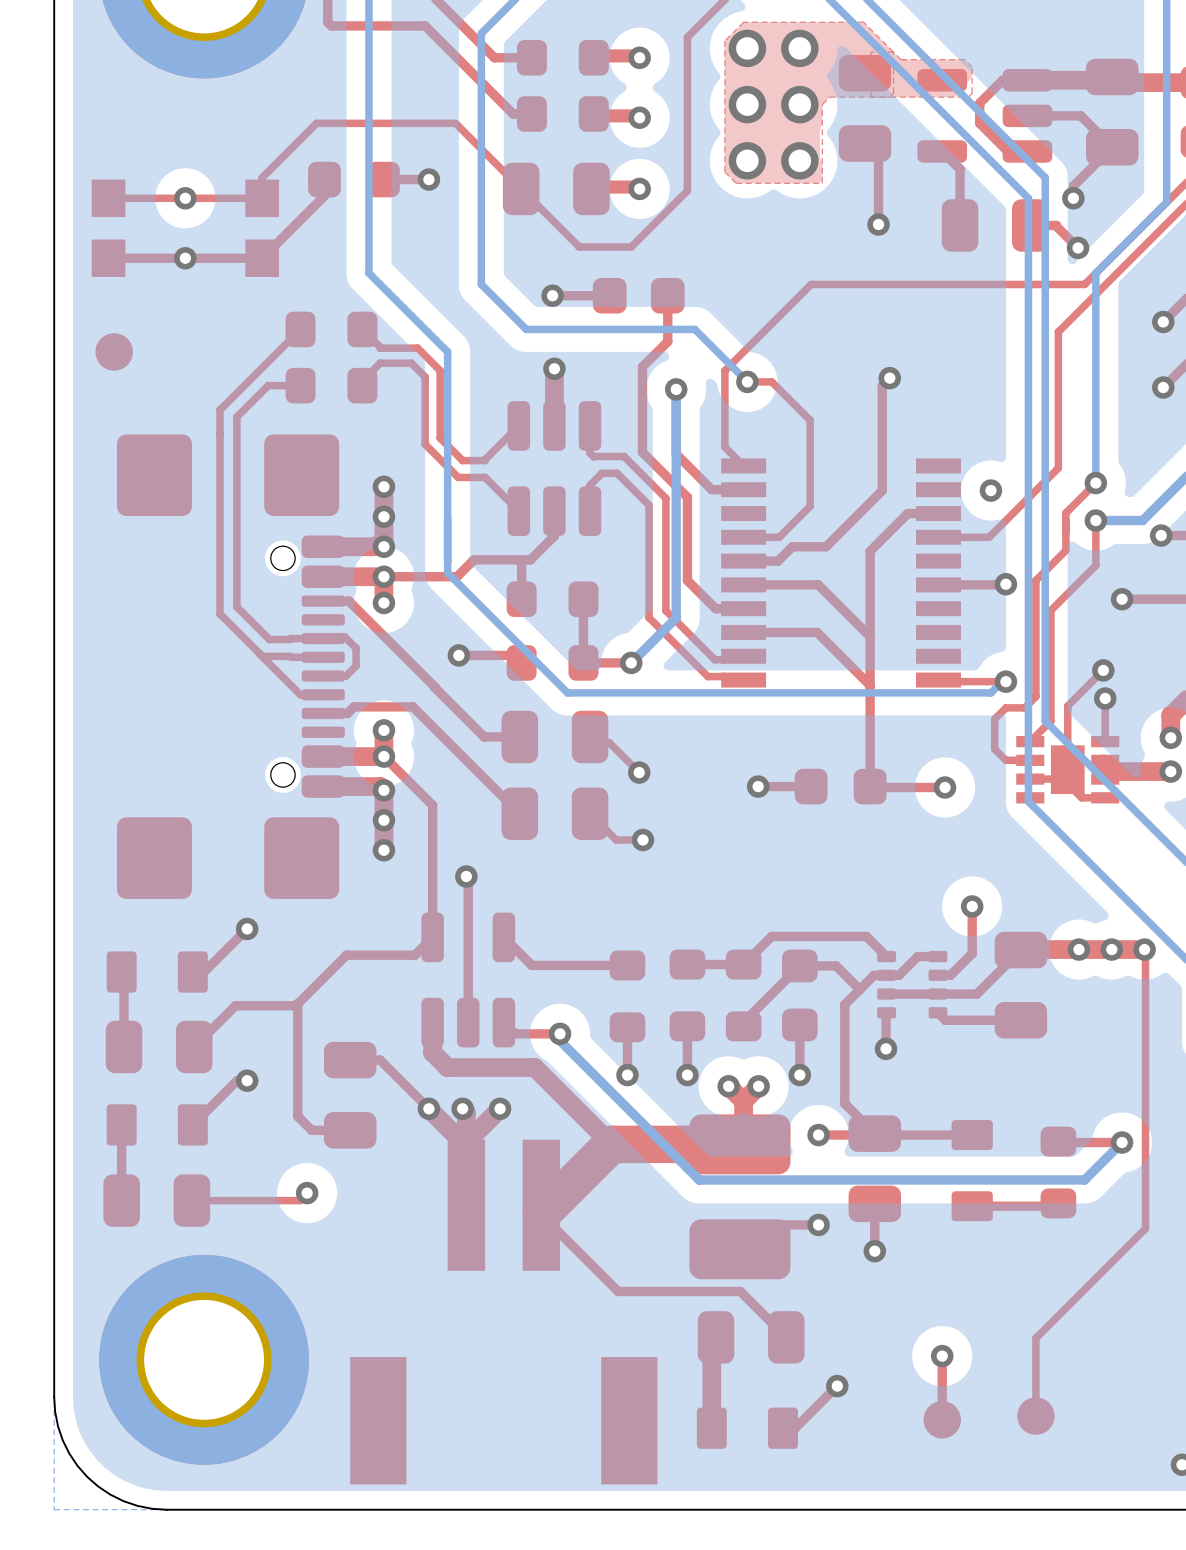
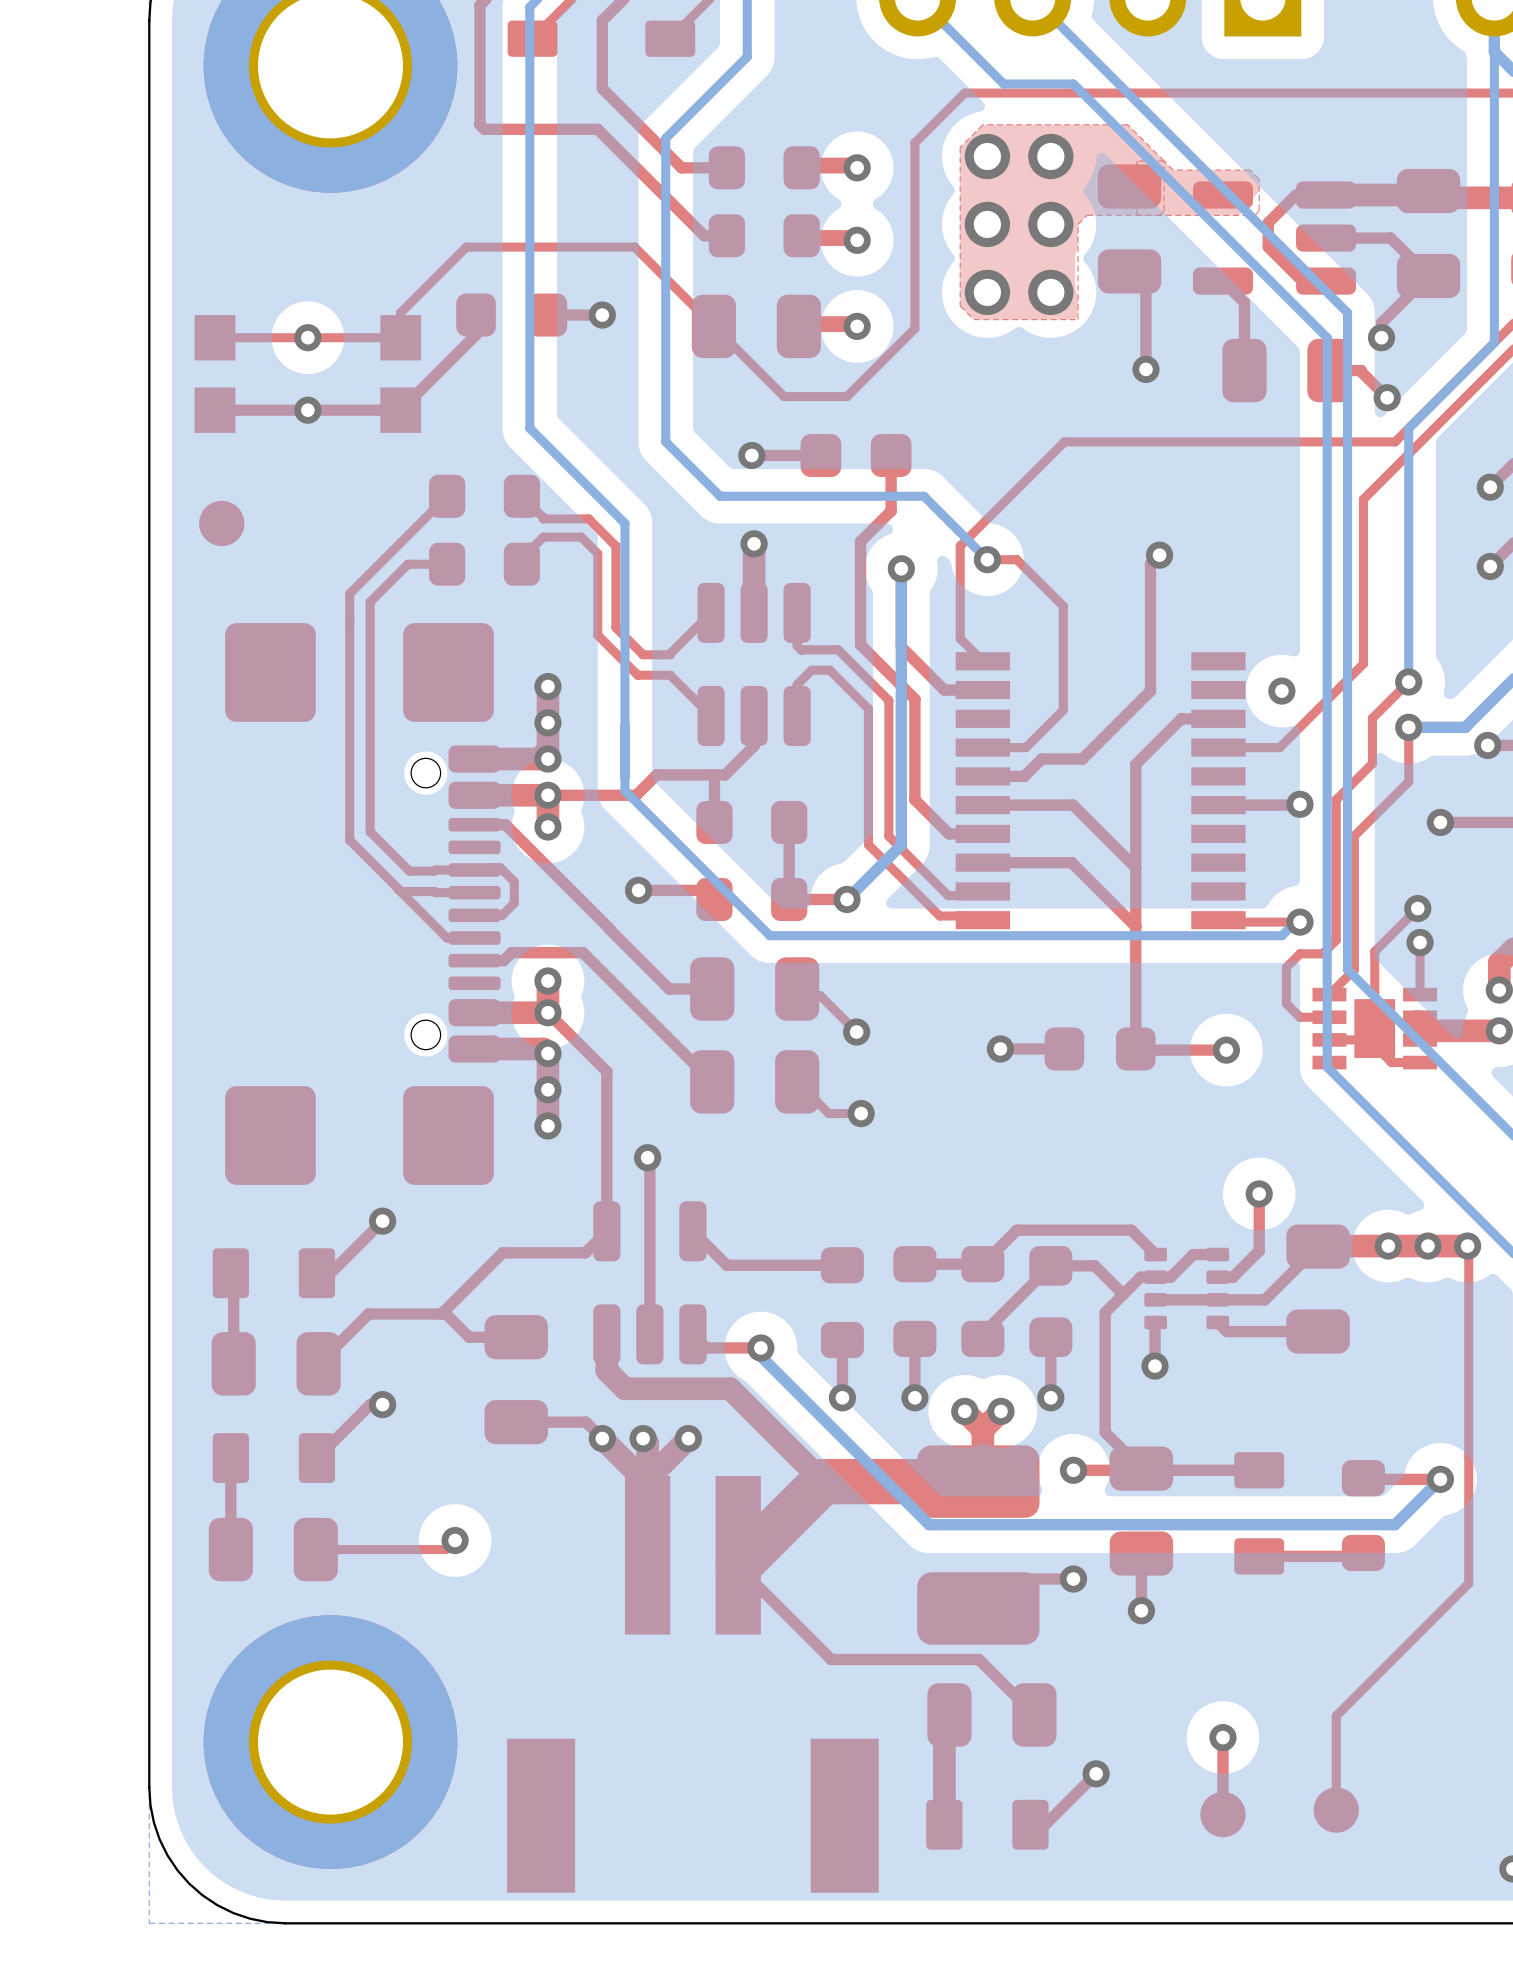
top track: (297, 1003) (297, 1116) (311, 1130) (350, 1130) -> (443, 1311) (469, 1337) (516, 1337)
top track: (350, 1060) (380, 1060) (415, 1095) -> (516, 1422) (585, 1422)
part position: (350, 1095) -> (516, 1379)

